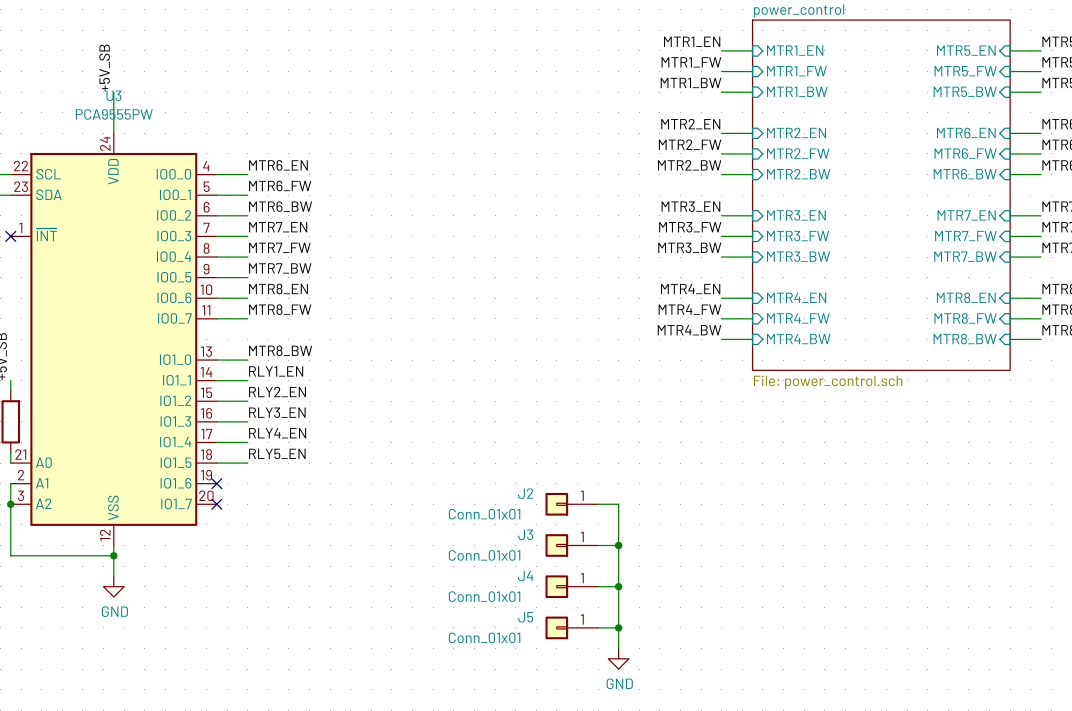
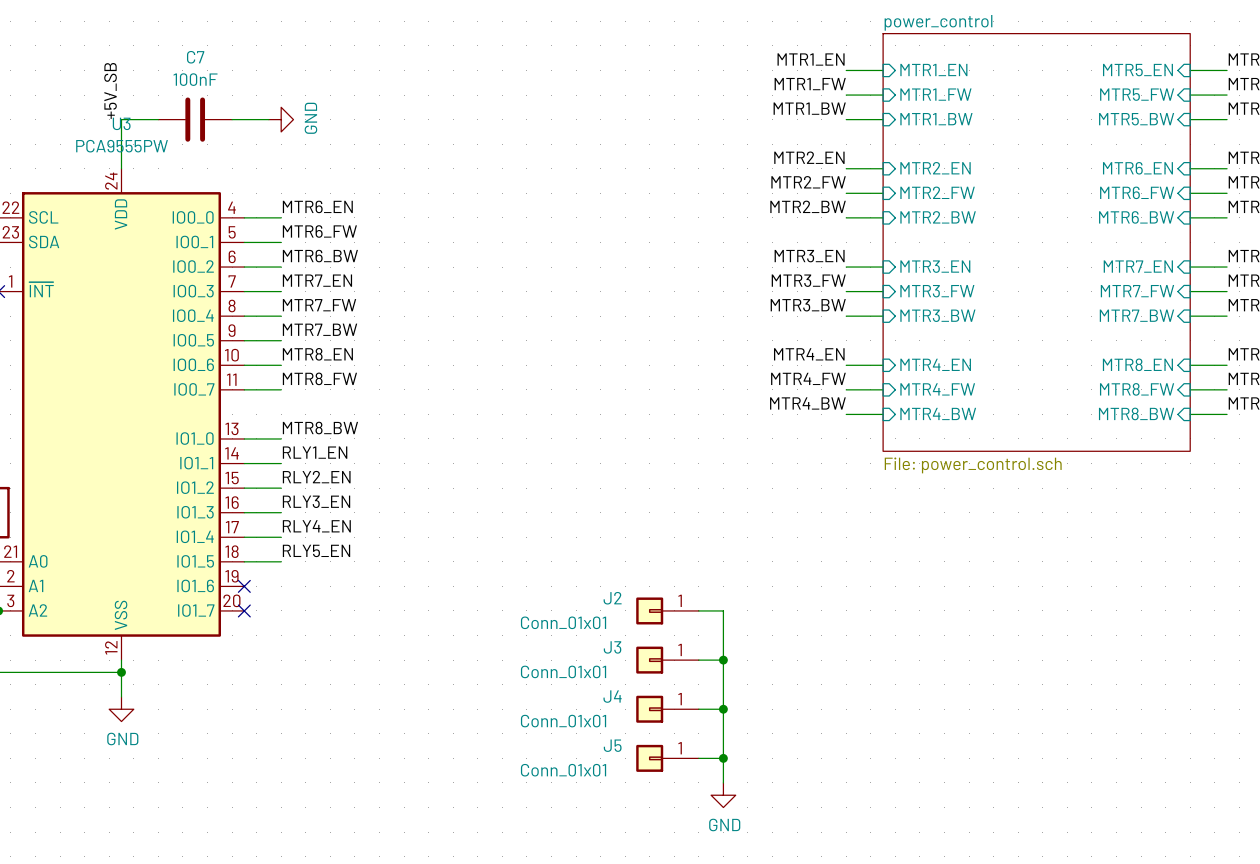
wire: none -> (121, 119) (158, 119)
C7: none -> 100nF (195, 119)
wire: none -> (232, 119) (268, 119)
power symbol: none -> GND (281, 119)

